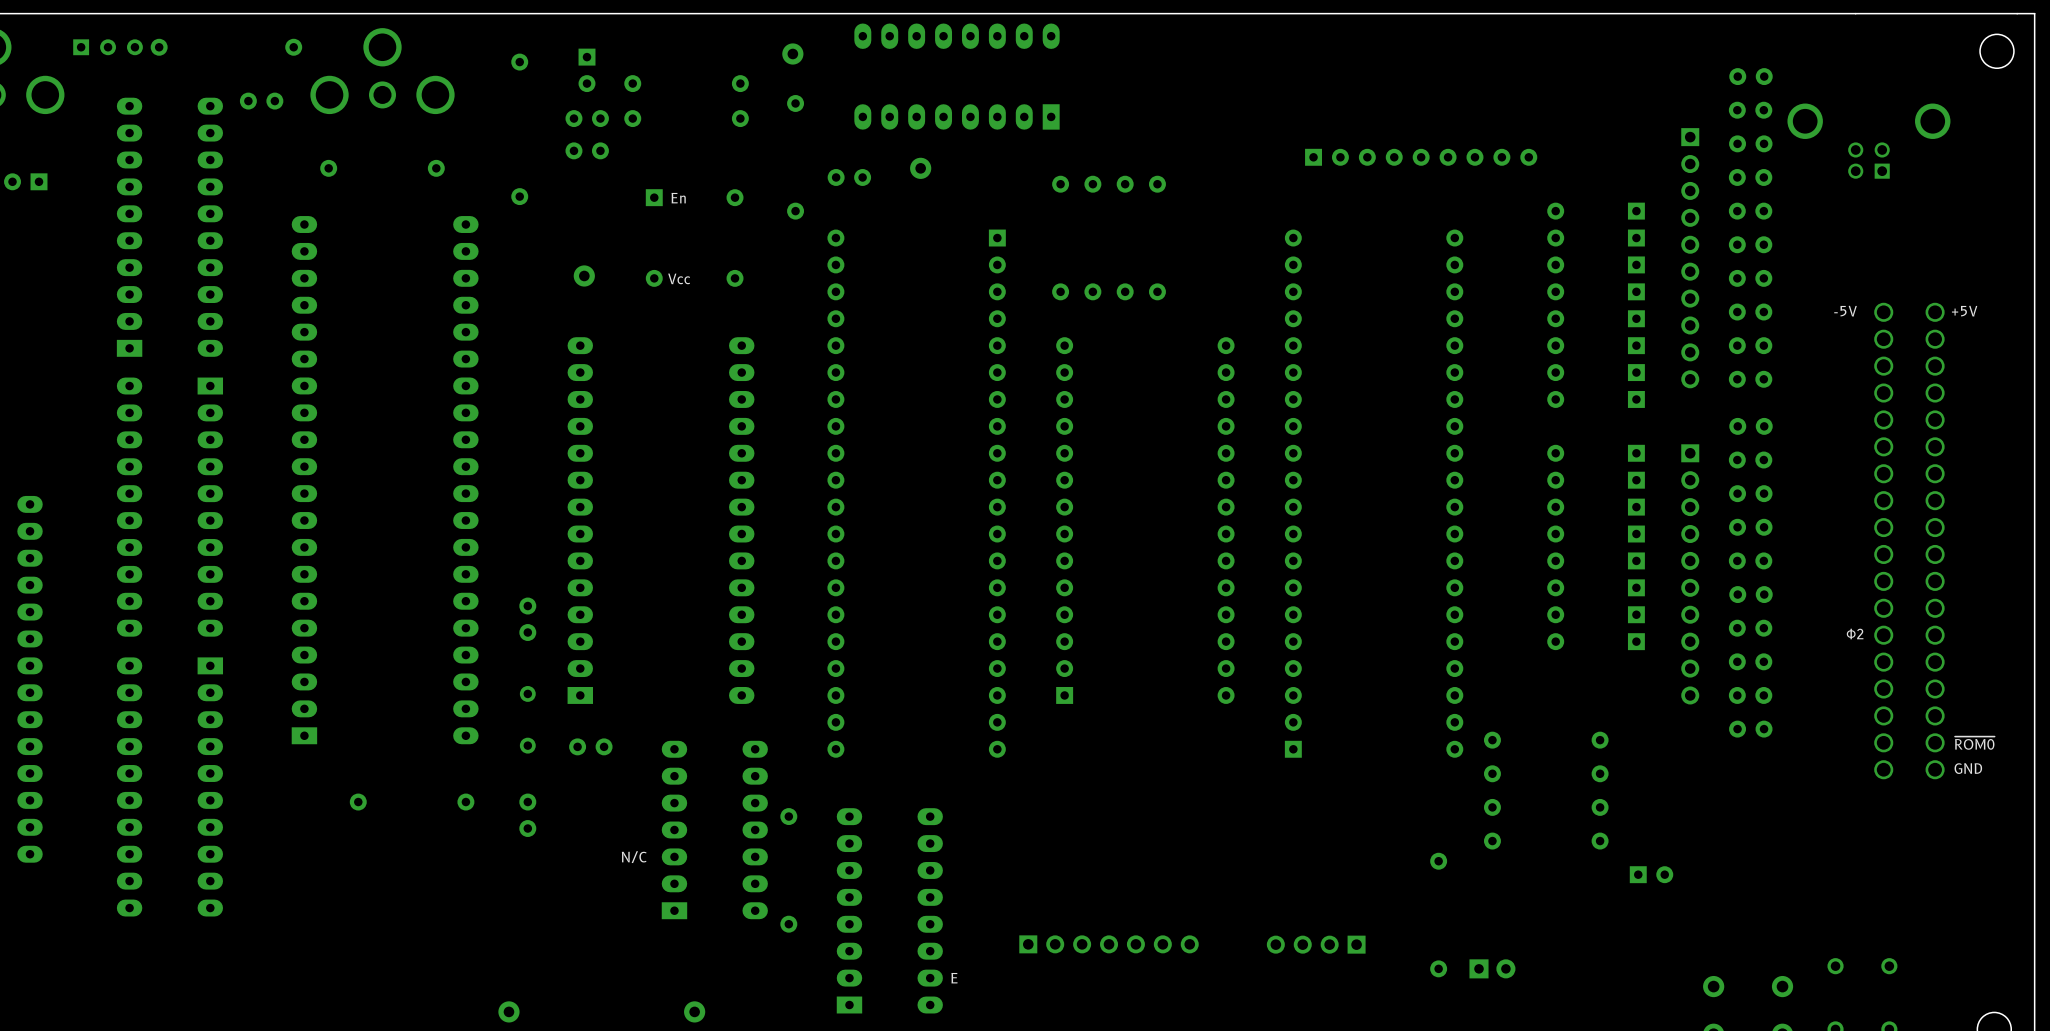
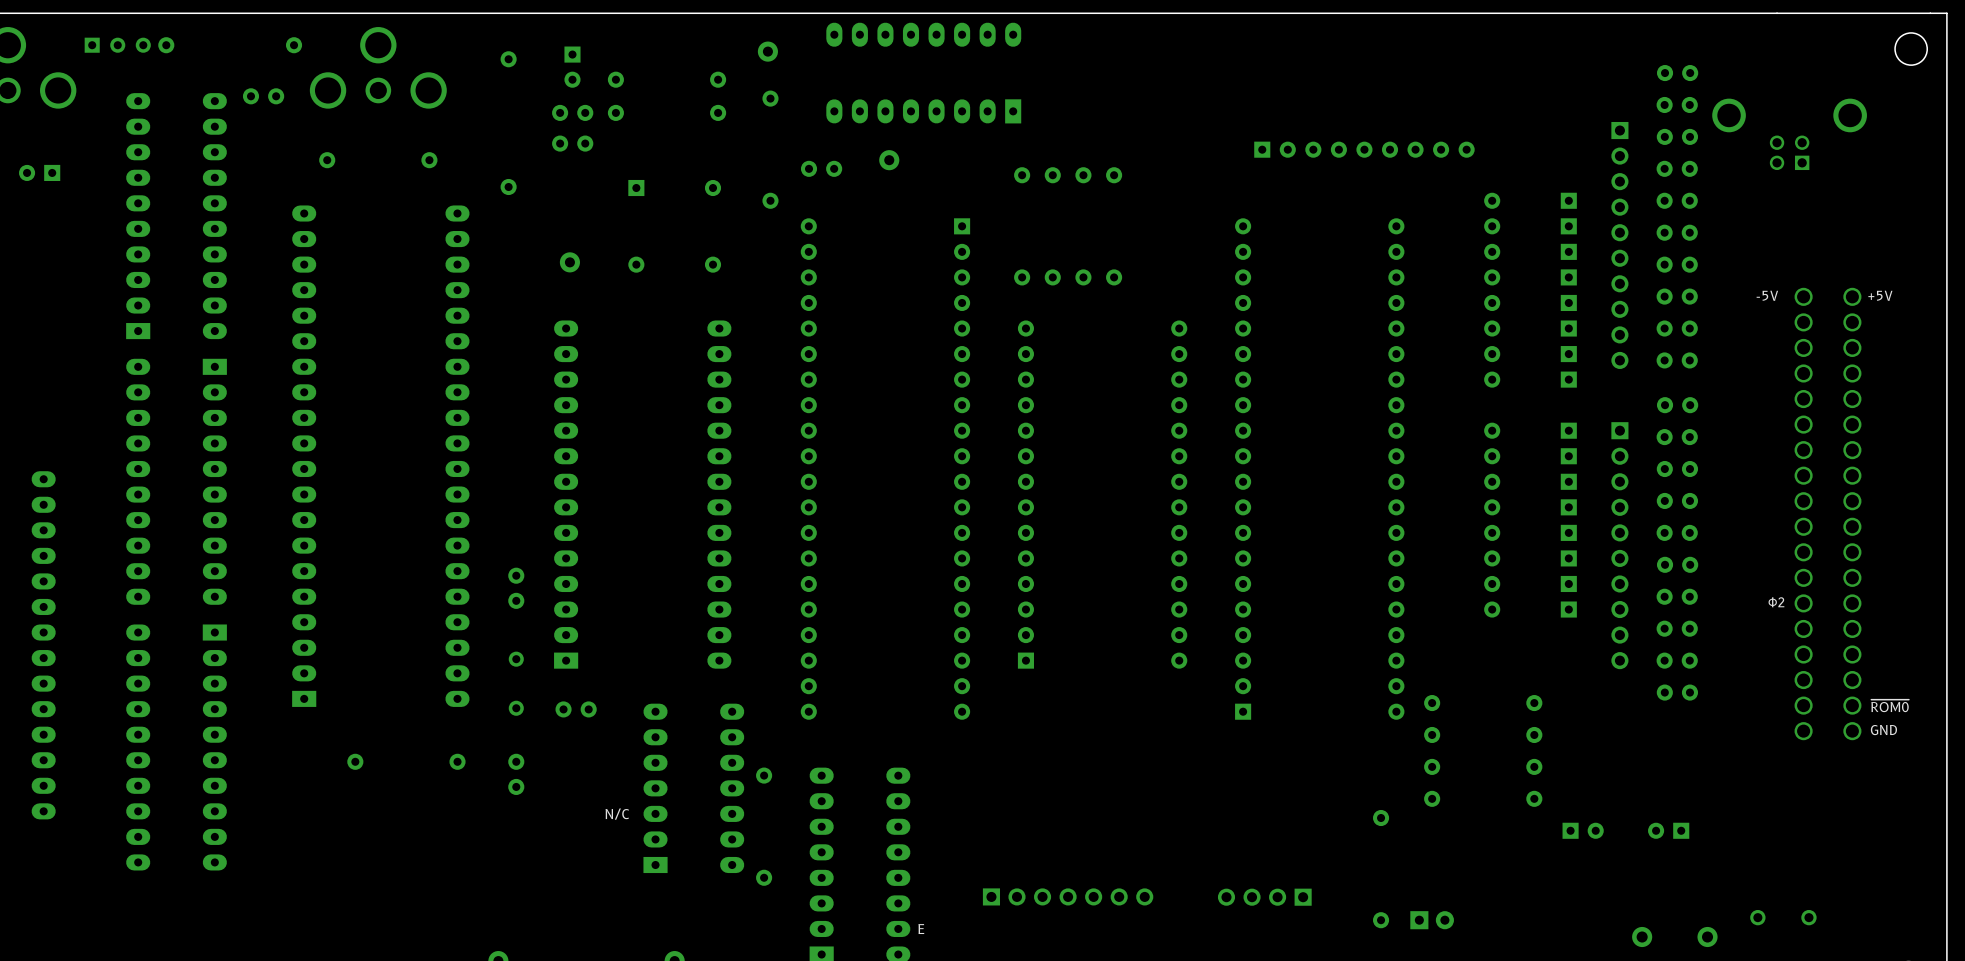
text: En (678, 198) -> none
text: Vcc (679, 278) -> none
part: none -> (1668, 830)

